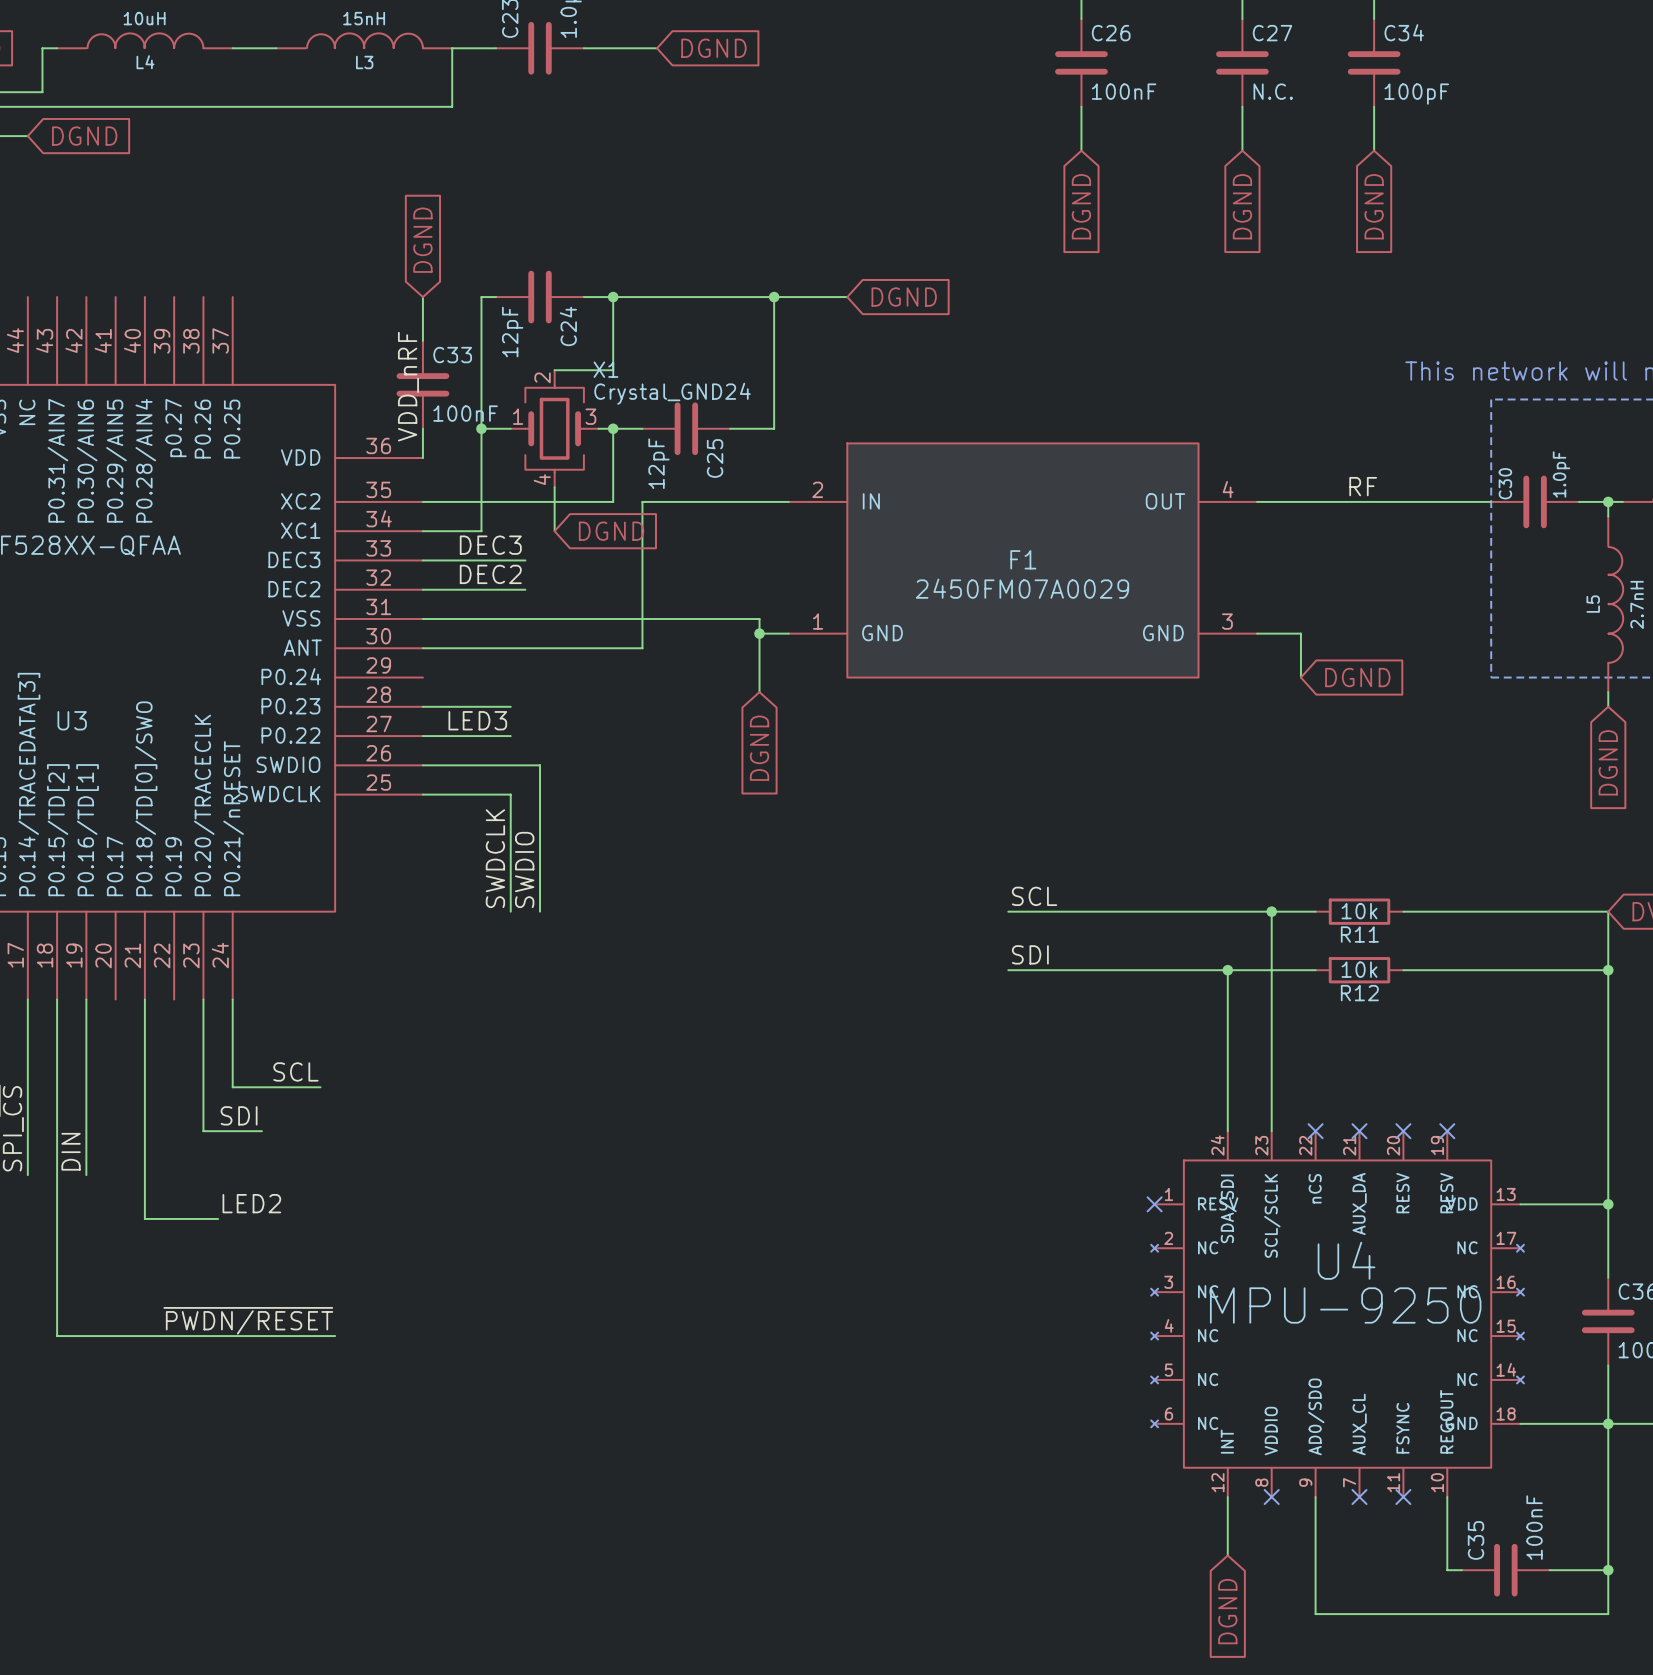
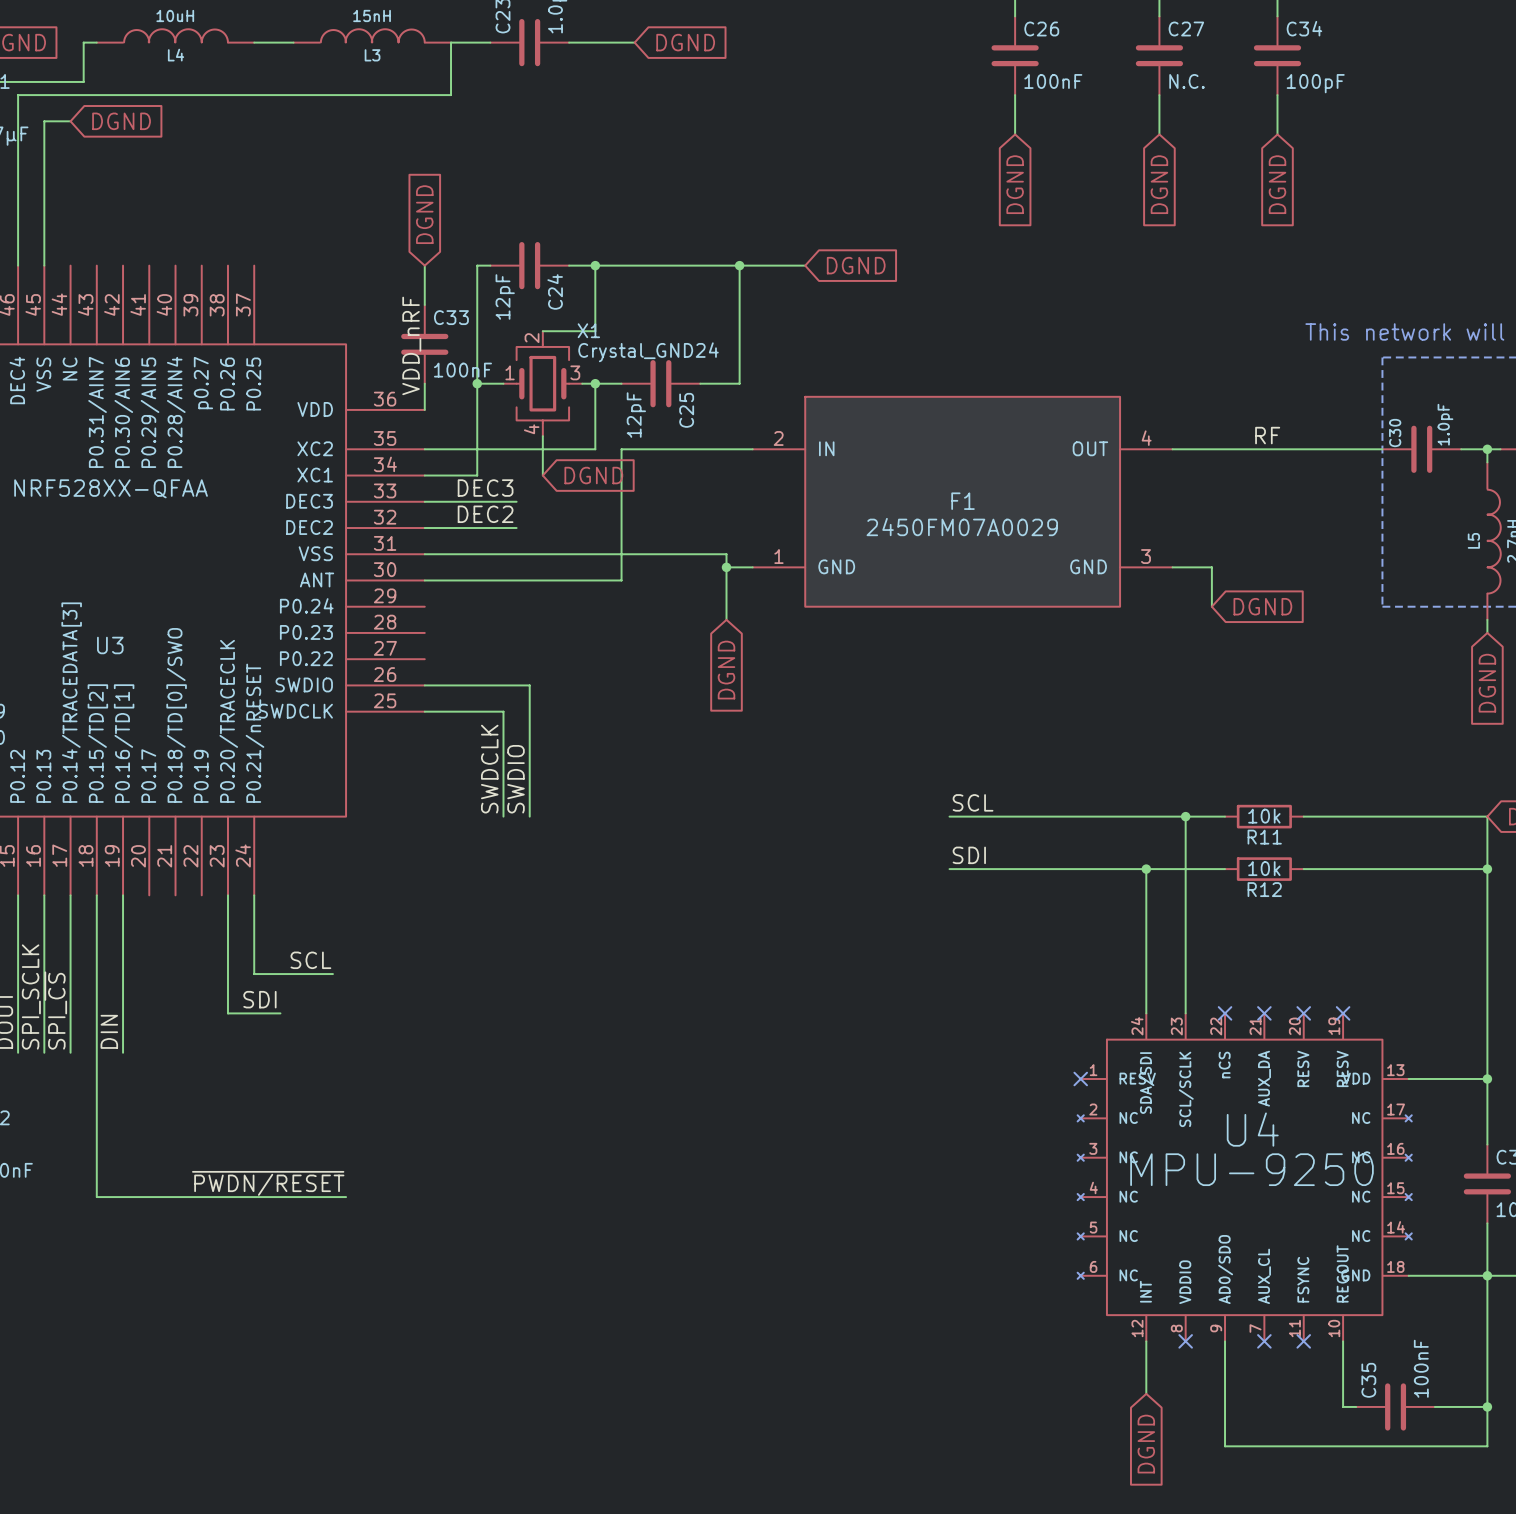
wire: (422, 706) (510, 706) -> none
label: LED3 (477, 720) -> none
wire: (422, 736) (510, 736) -> none
wire: (144, 999) (144, 1218) (218, 1218) -> none
label: LED2 (251, 1203) -> none

